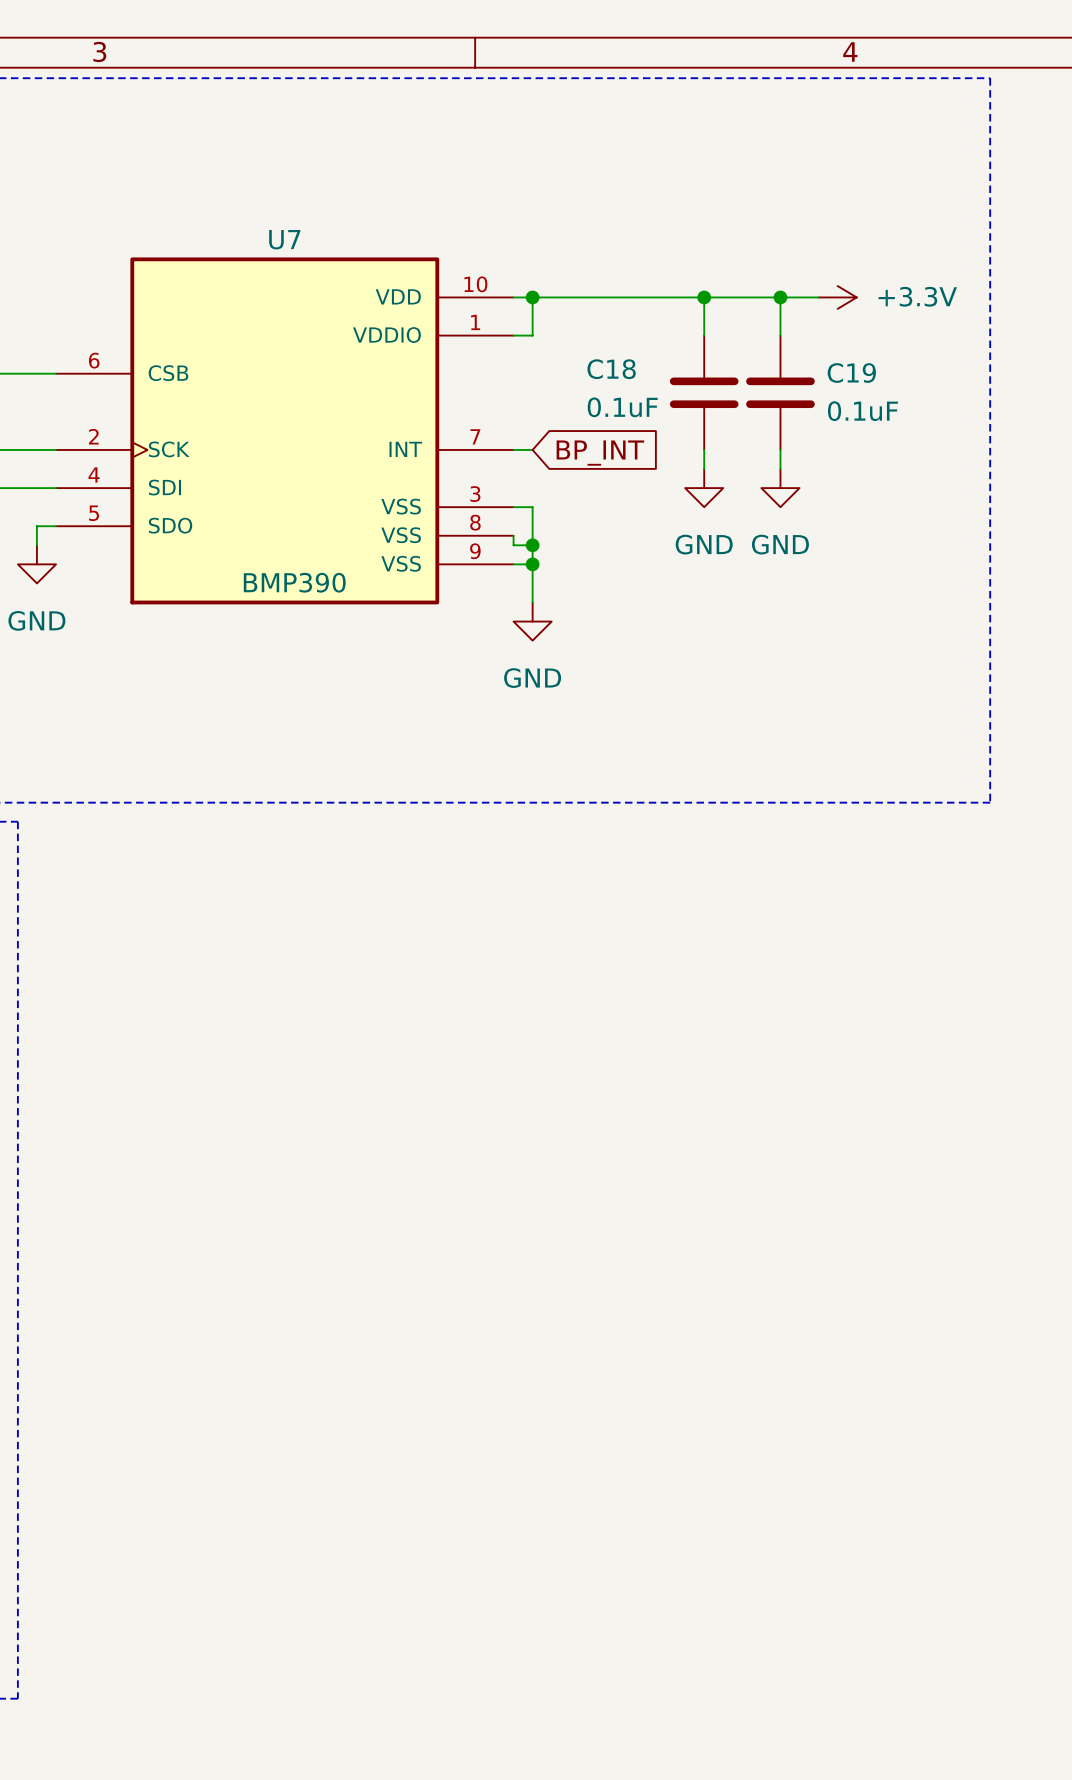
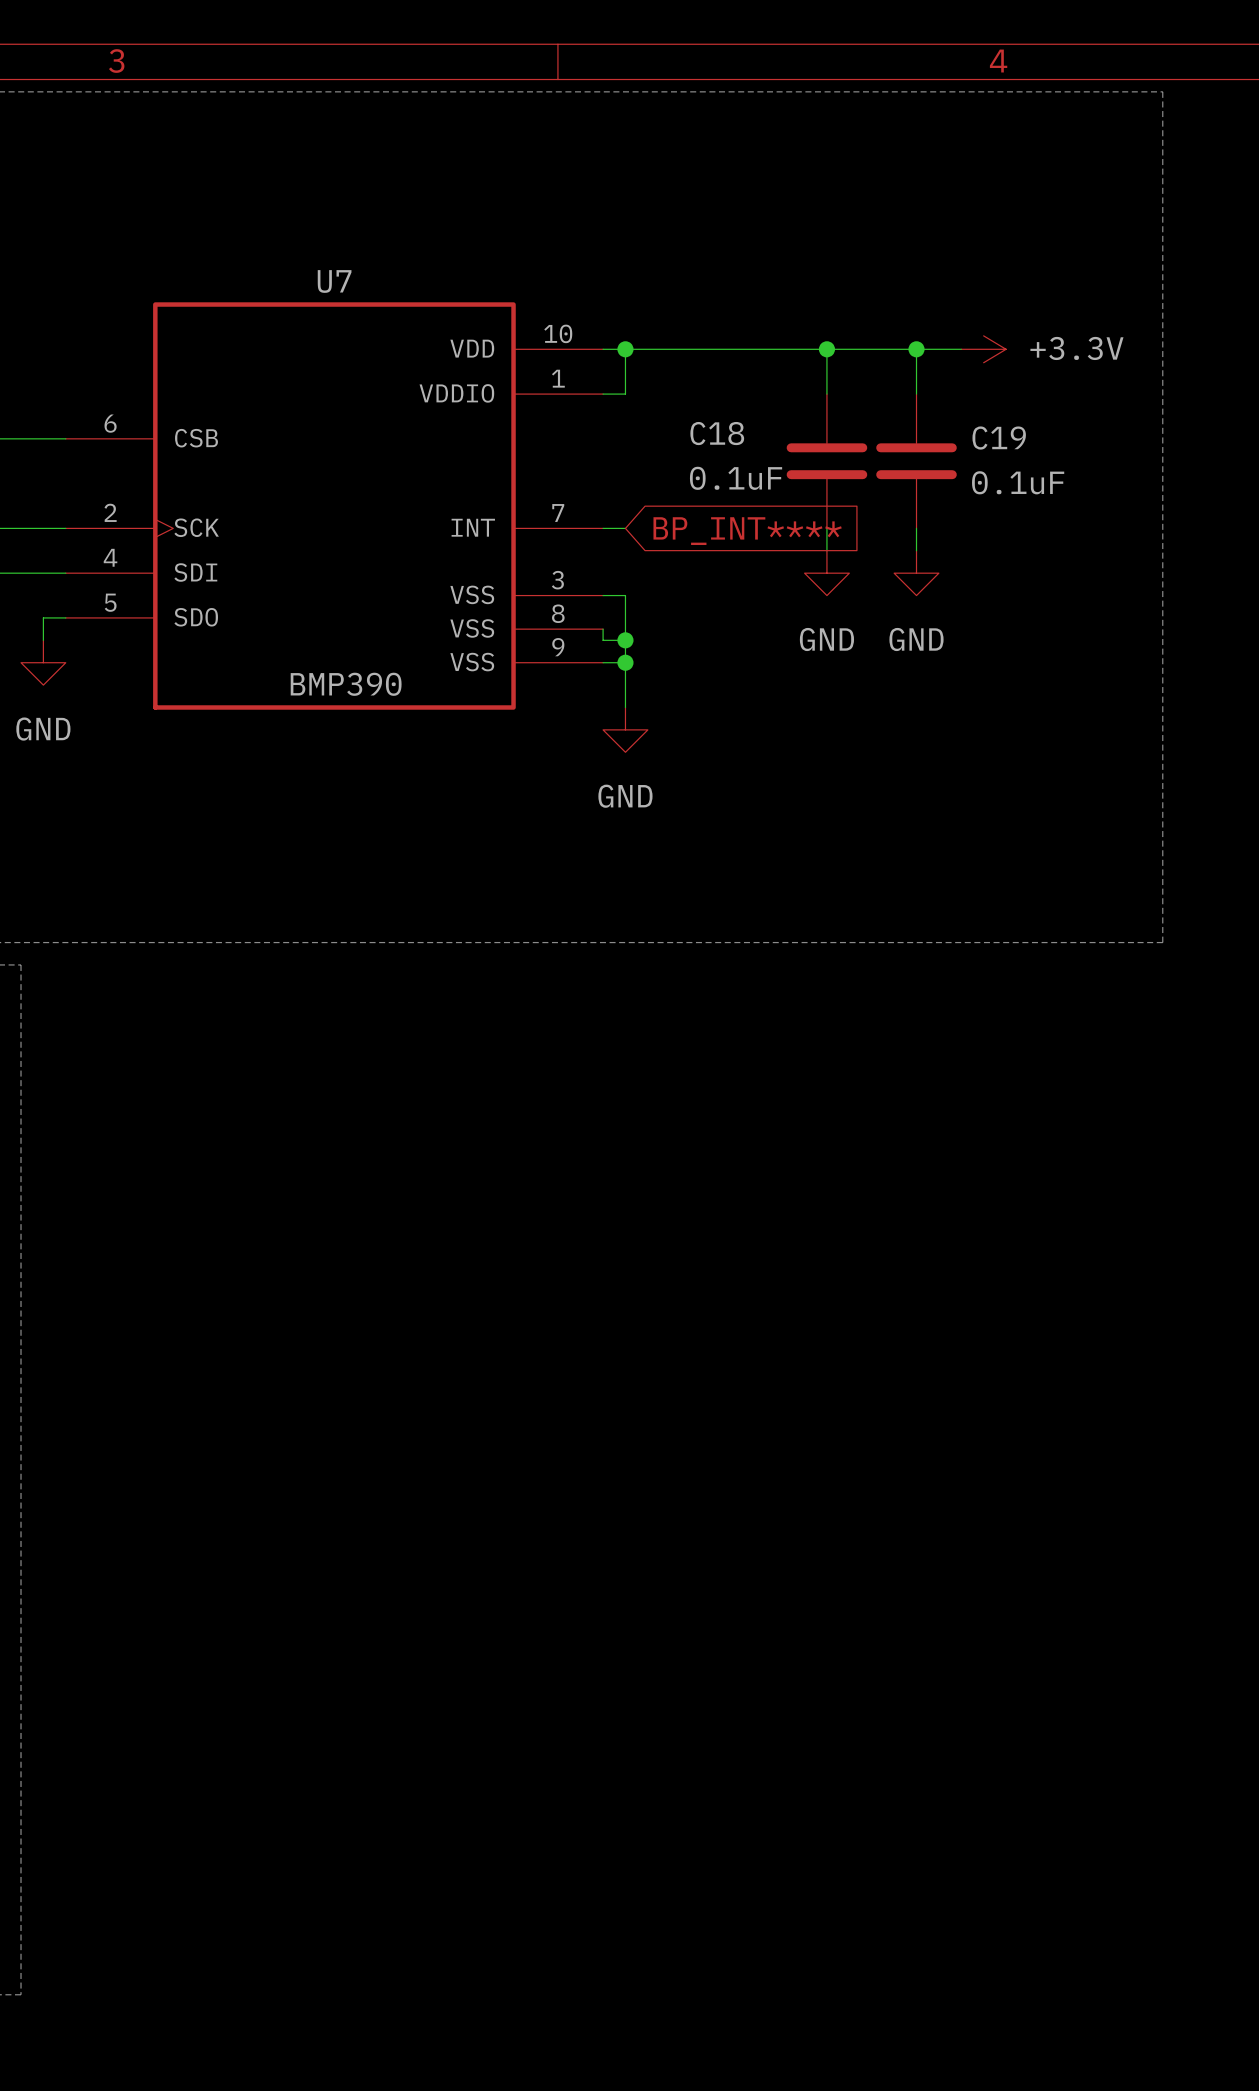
global label: BP_INT (600, 453) -> BP_INT**** (747, 531)

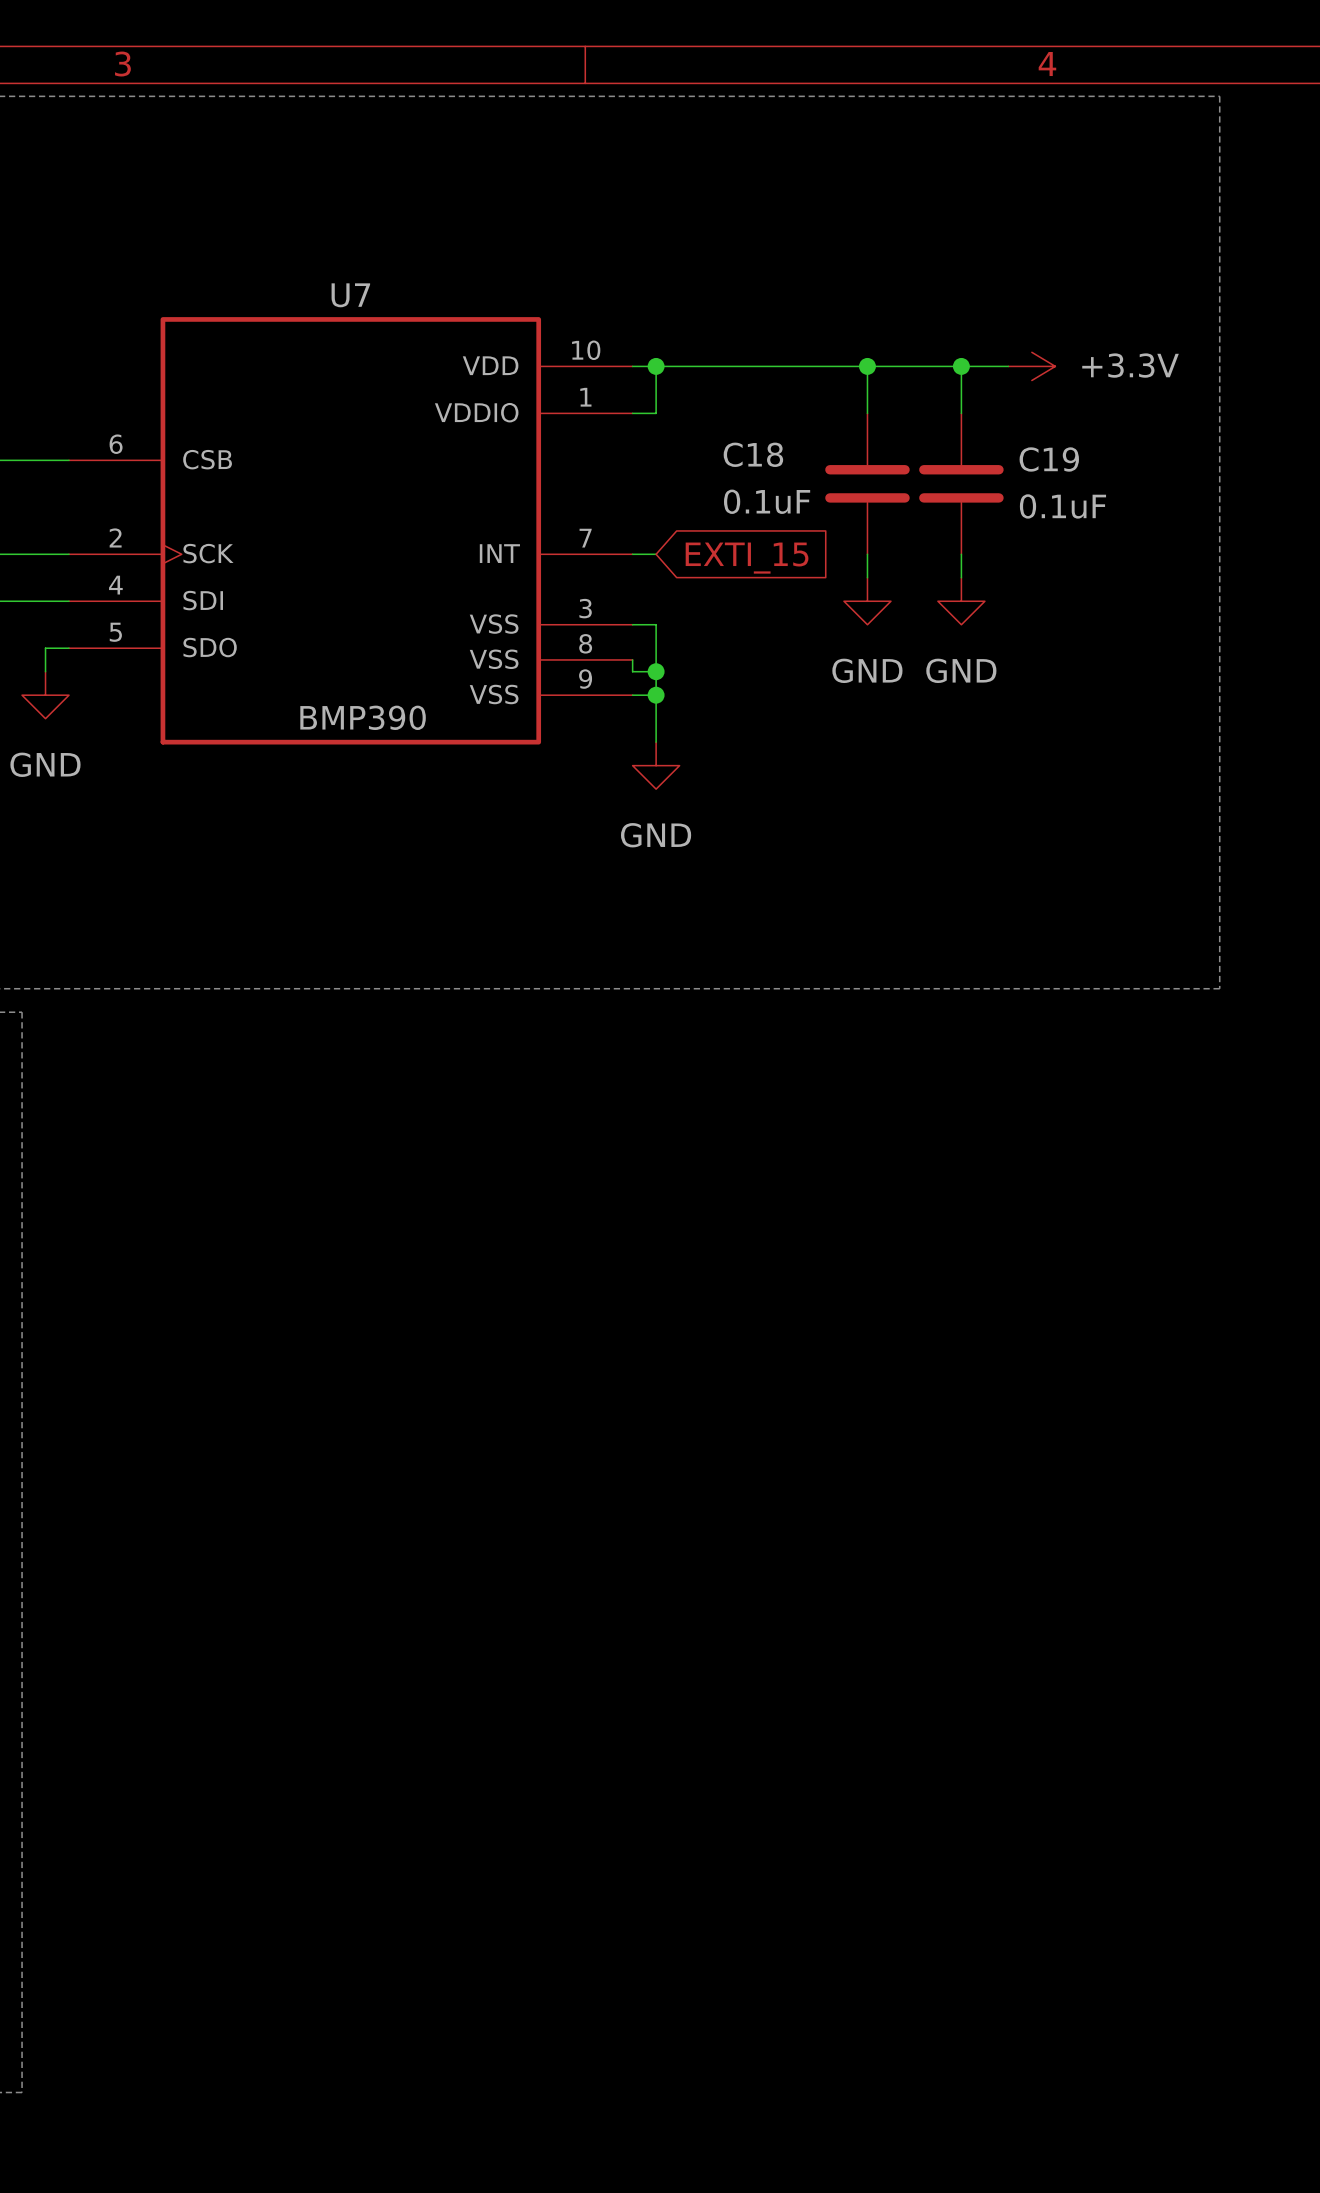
global label: BP_INT**** (747, 531) -> EXTI_15 (747, 558)

